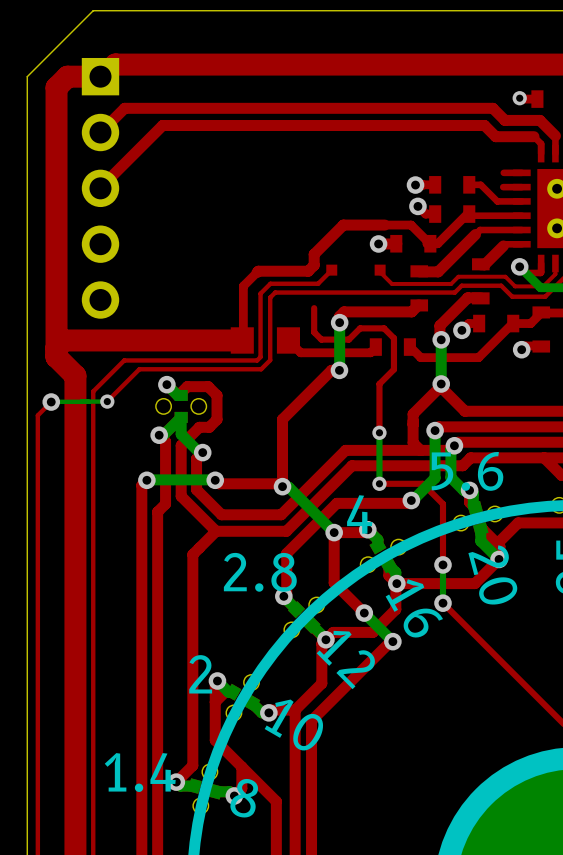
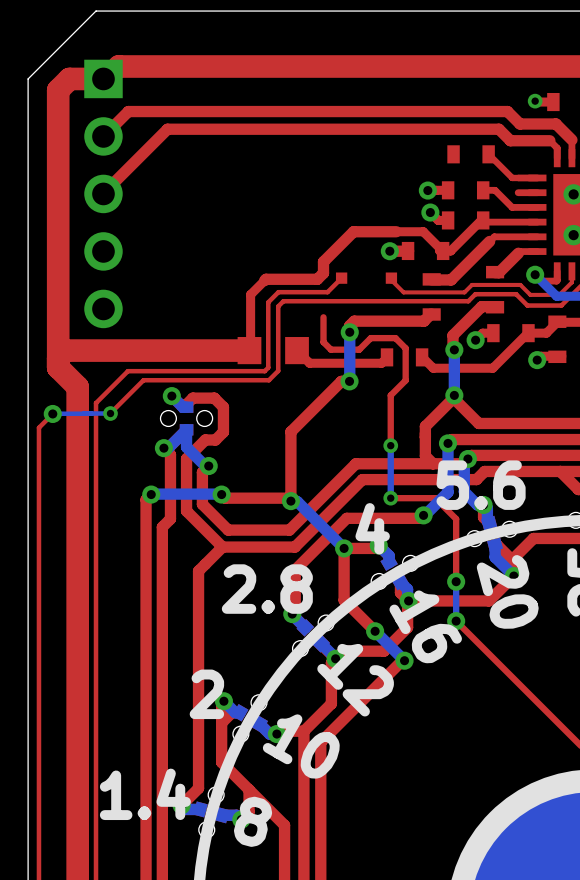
part: none -> (471, 154)
top track: none -> (488, 154) (512, 177) (518, 177)

